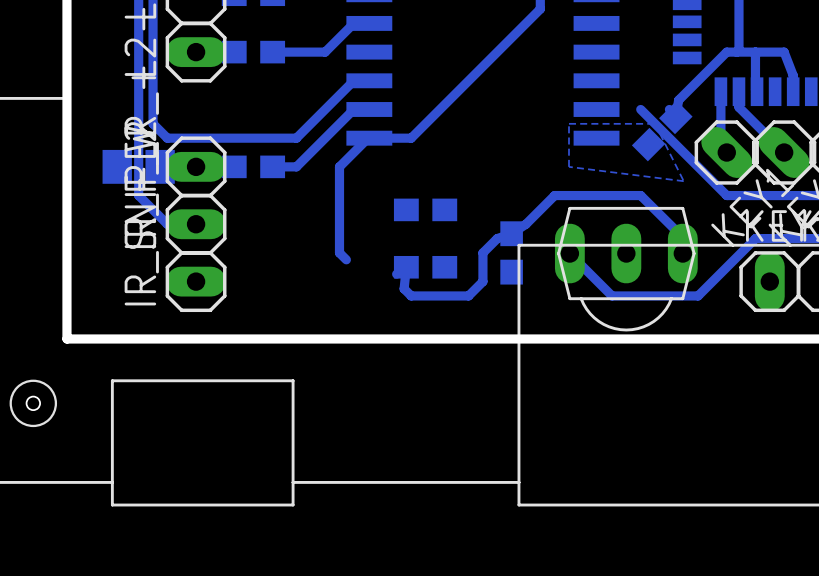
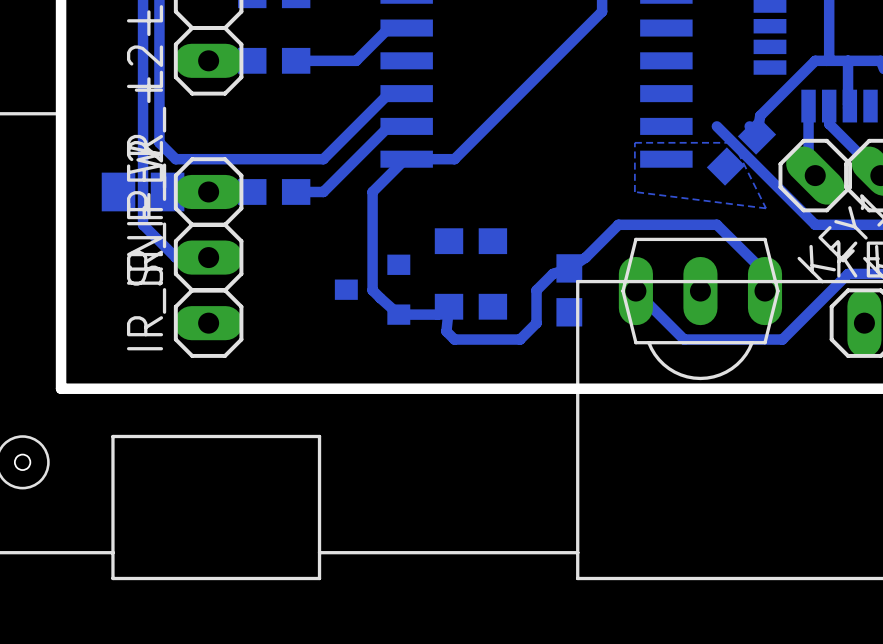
part: none -> (372, 289)
bottom track: none -> (380, 298) (398, 314) (437, 314)

